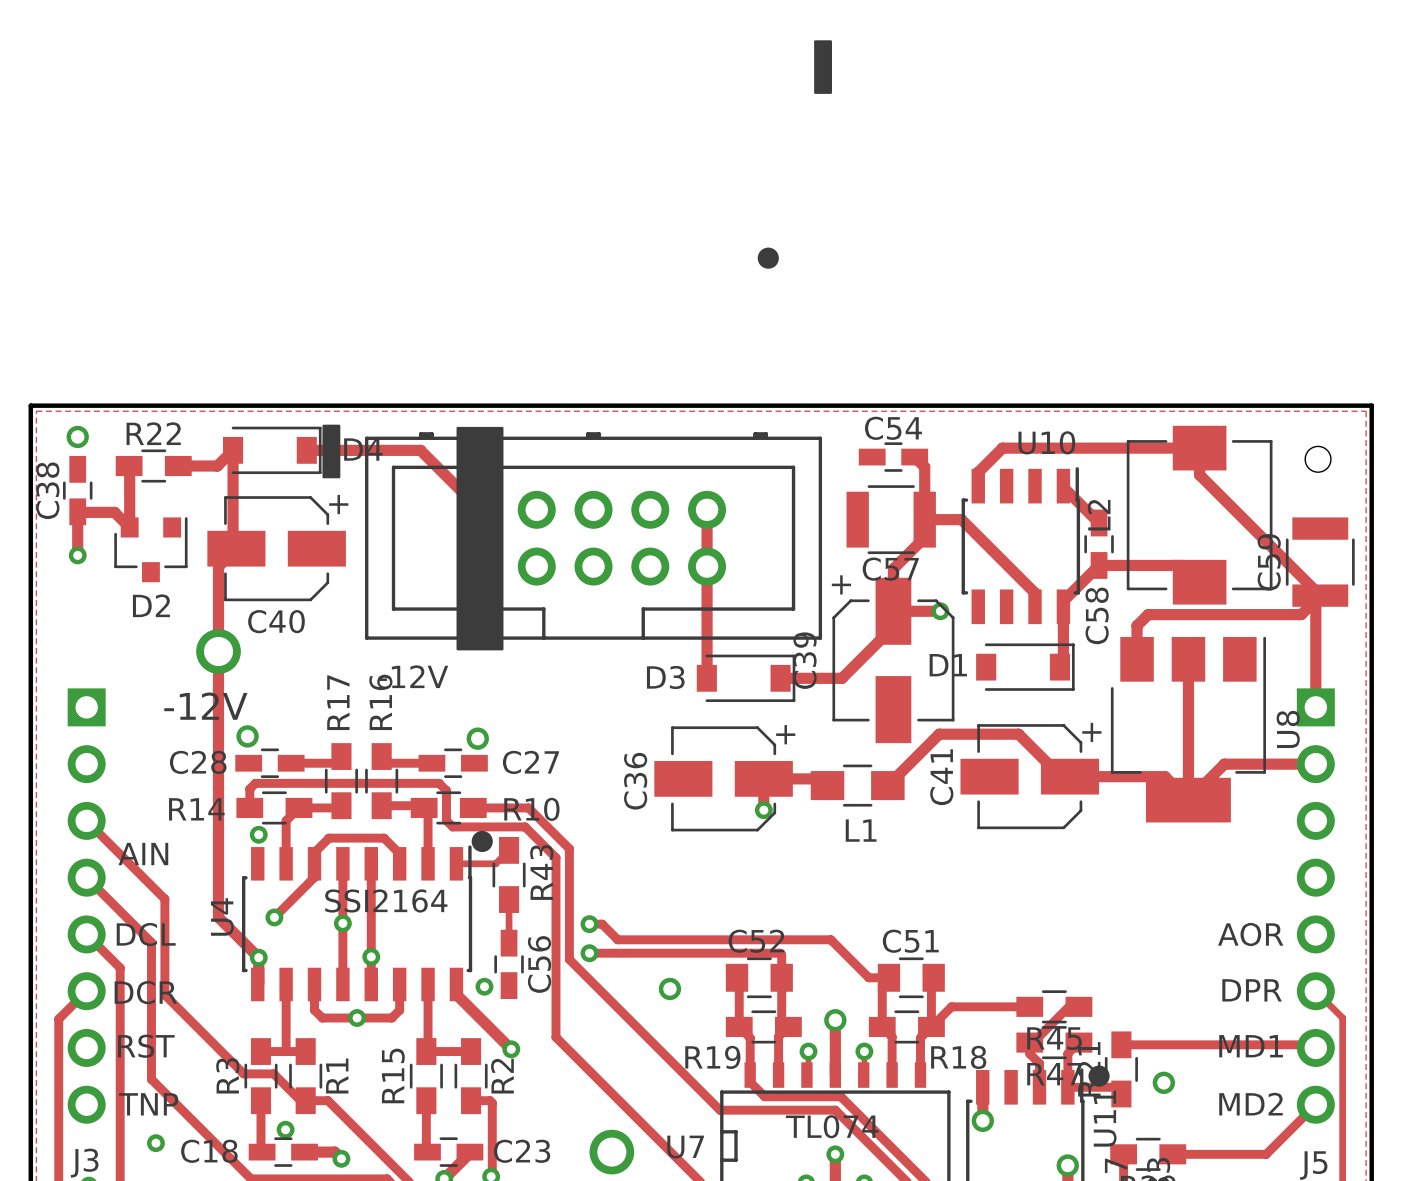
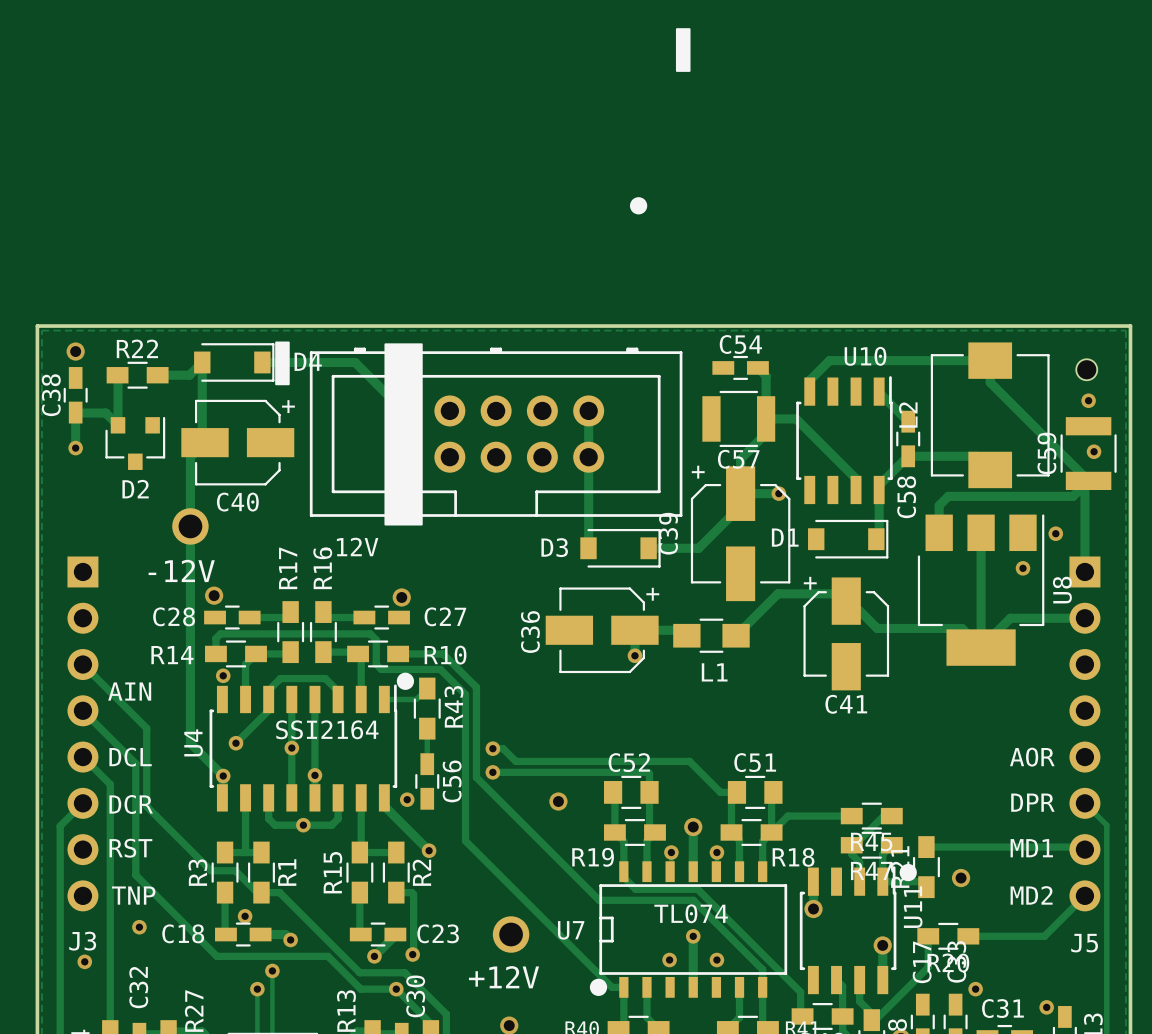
via: none -> (1088, 400)
via: none -> (1094, 451)
via: none -> (1055, 533)
via: none -> (1022, 568)
C41 rotation: 0° (1029, 776) -> 90° counterclockwise (846, 633)

